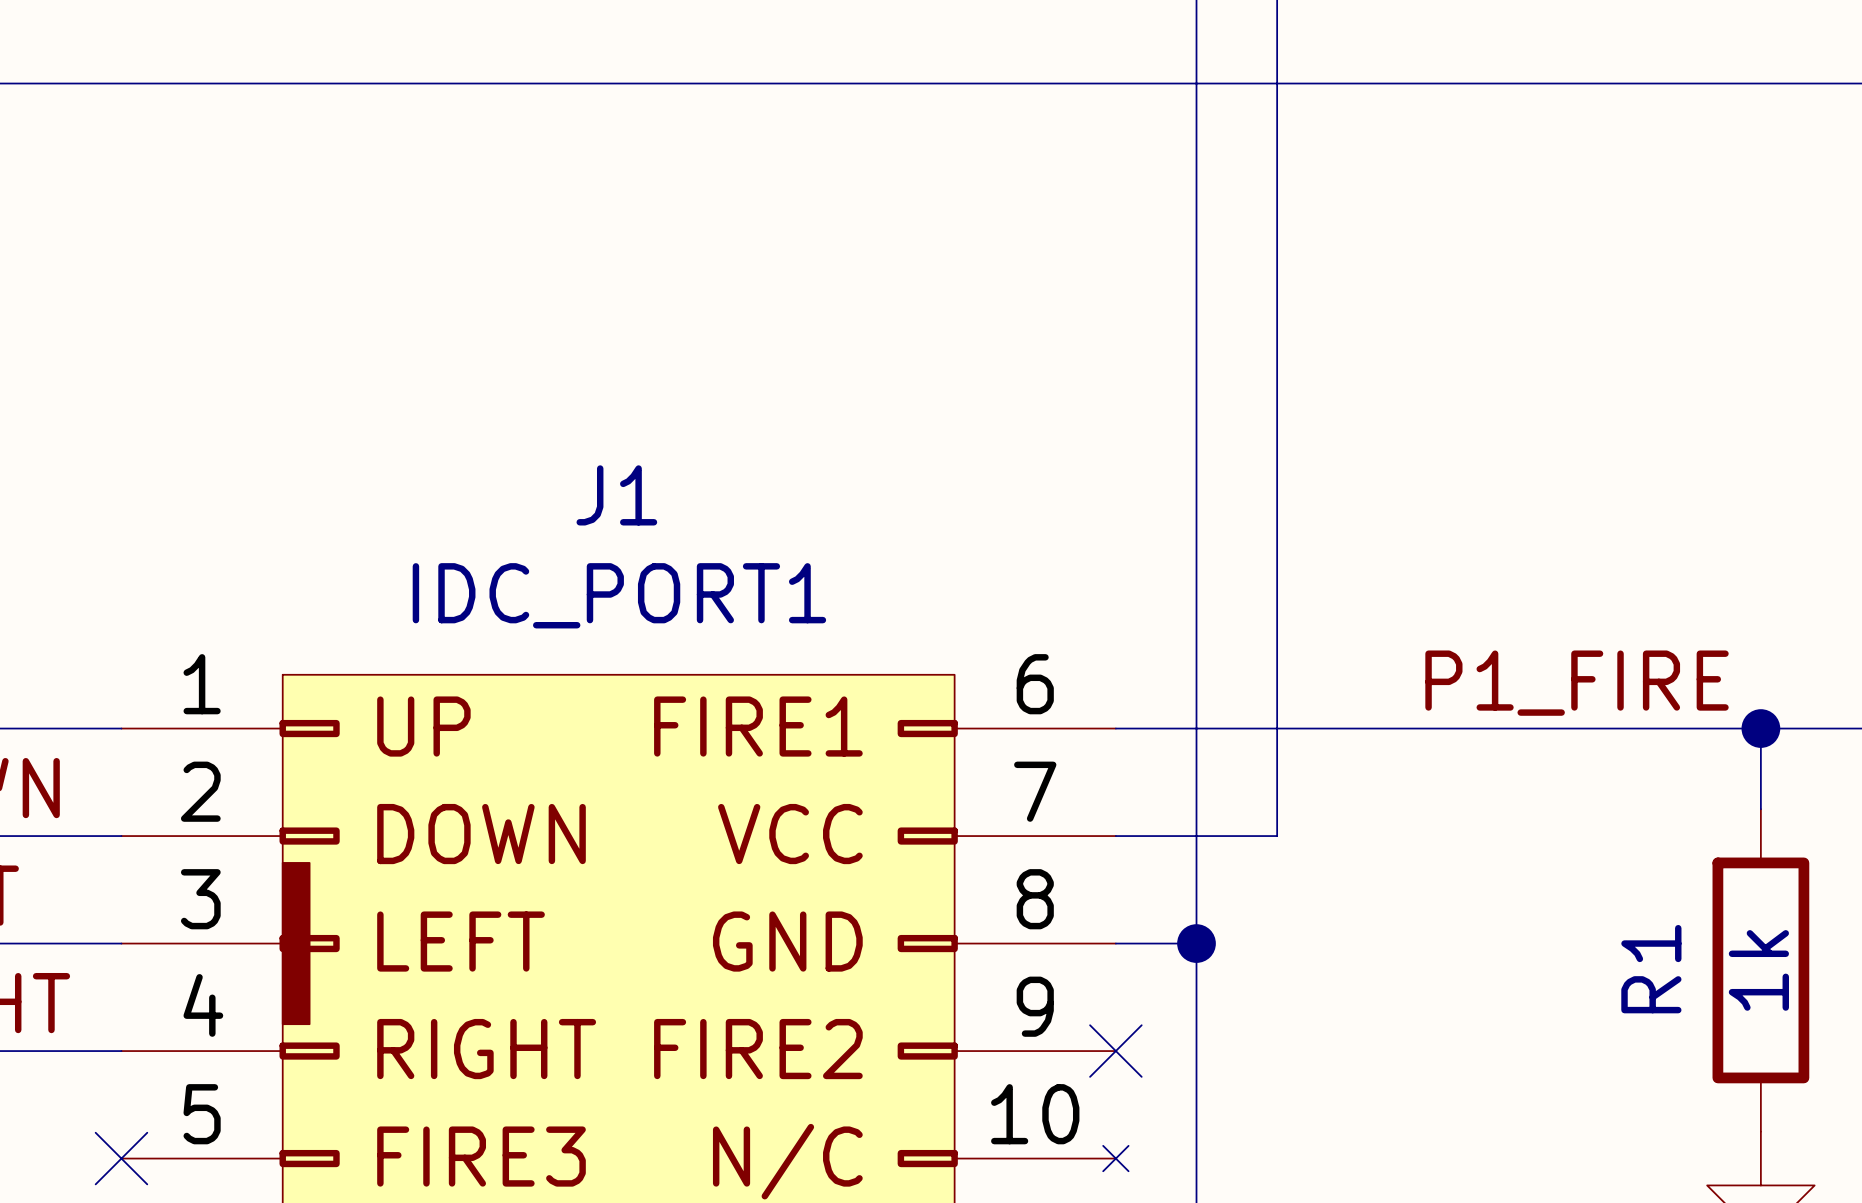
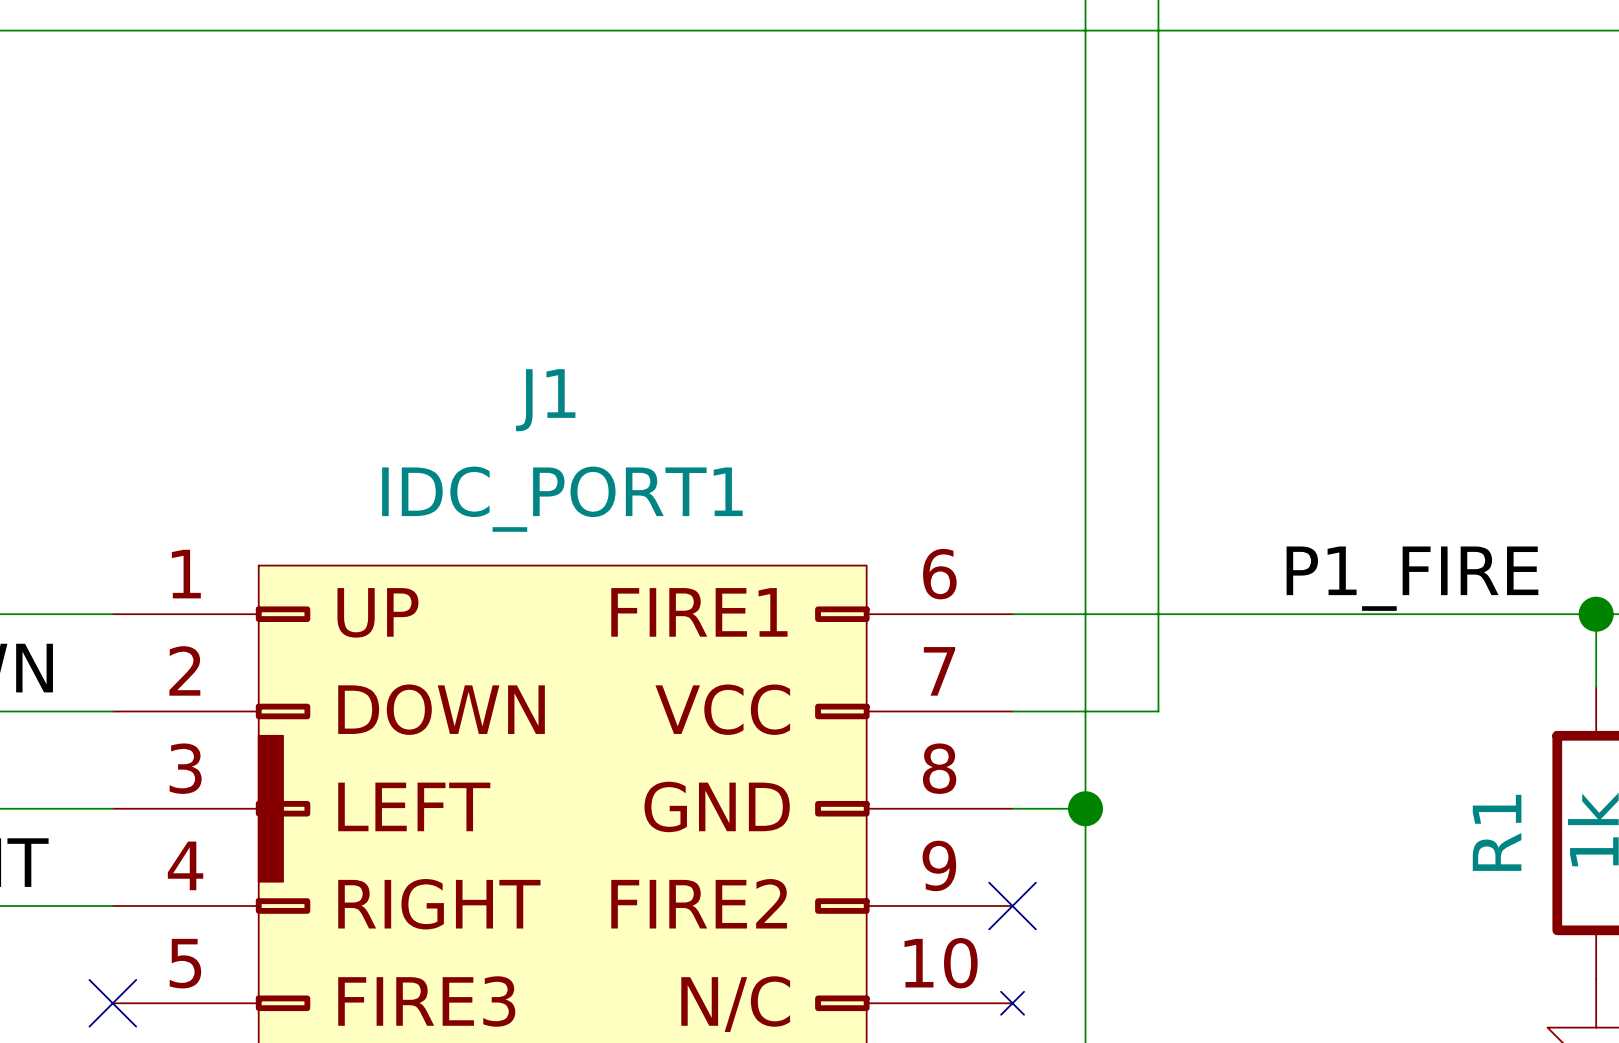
J1 name position: J1 (616, 495) -> J1 (545, 400)

